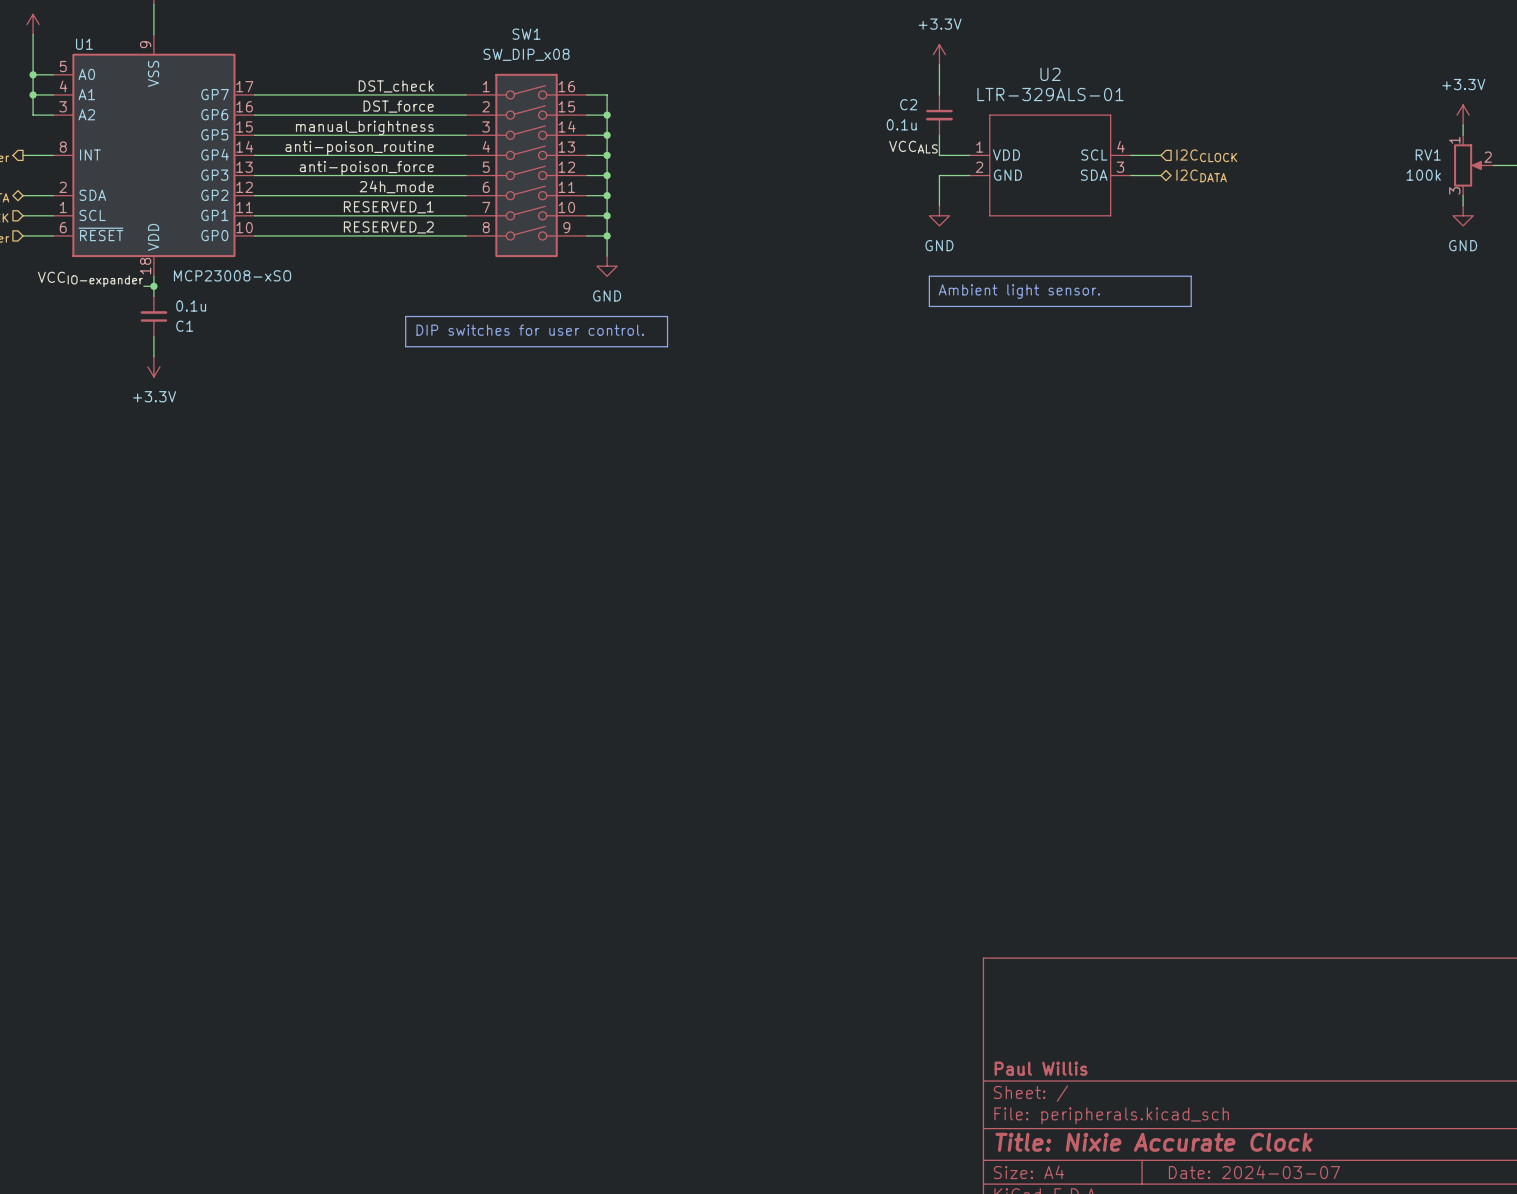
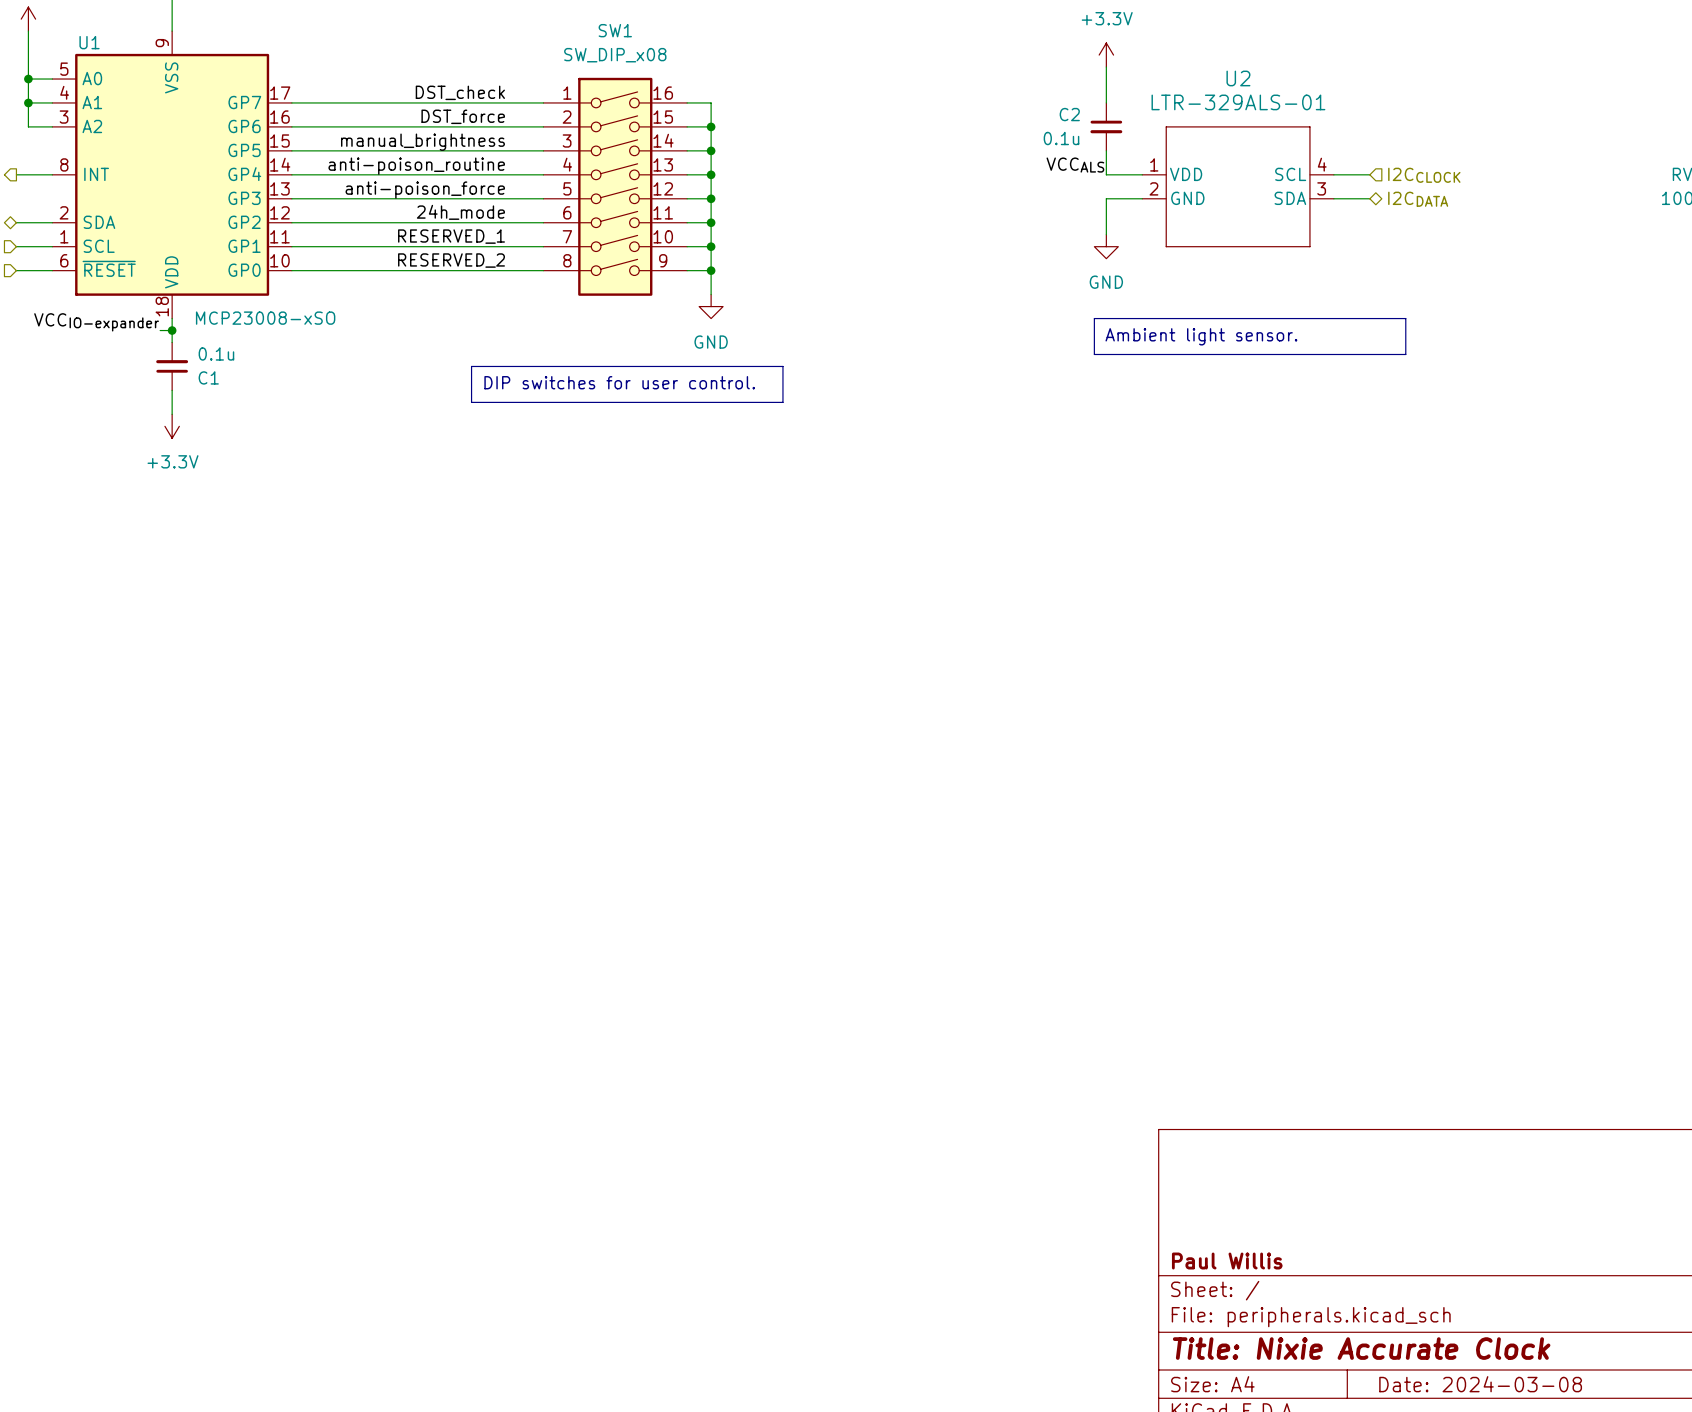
title block: Date: 2024-03-07 (1254, 1172) -> Date: 2024-03-08 (1480, 1384)

